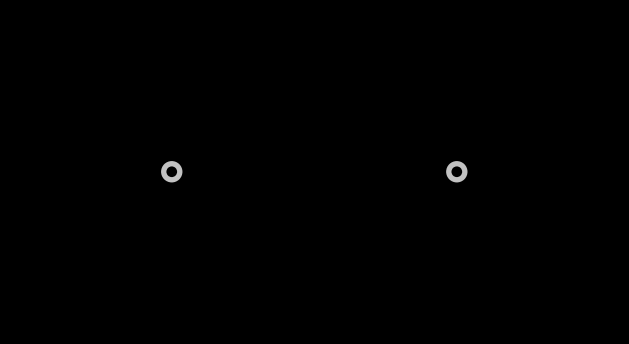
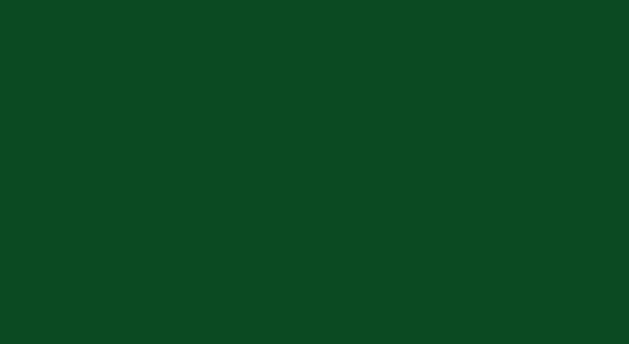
via: (171, 171) -> none
via: (456, 171) -> none

